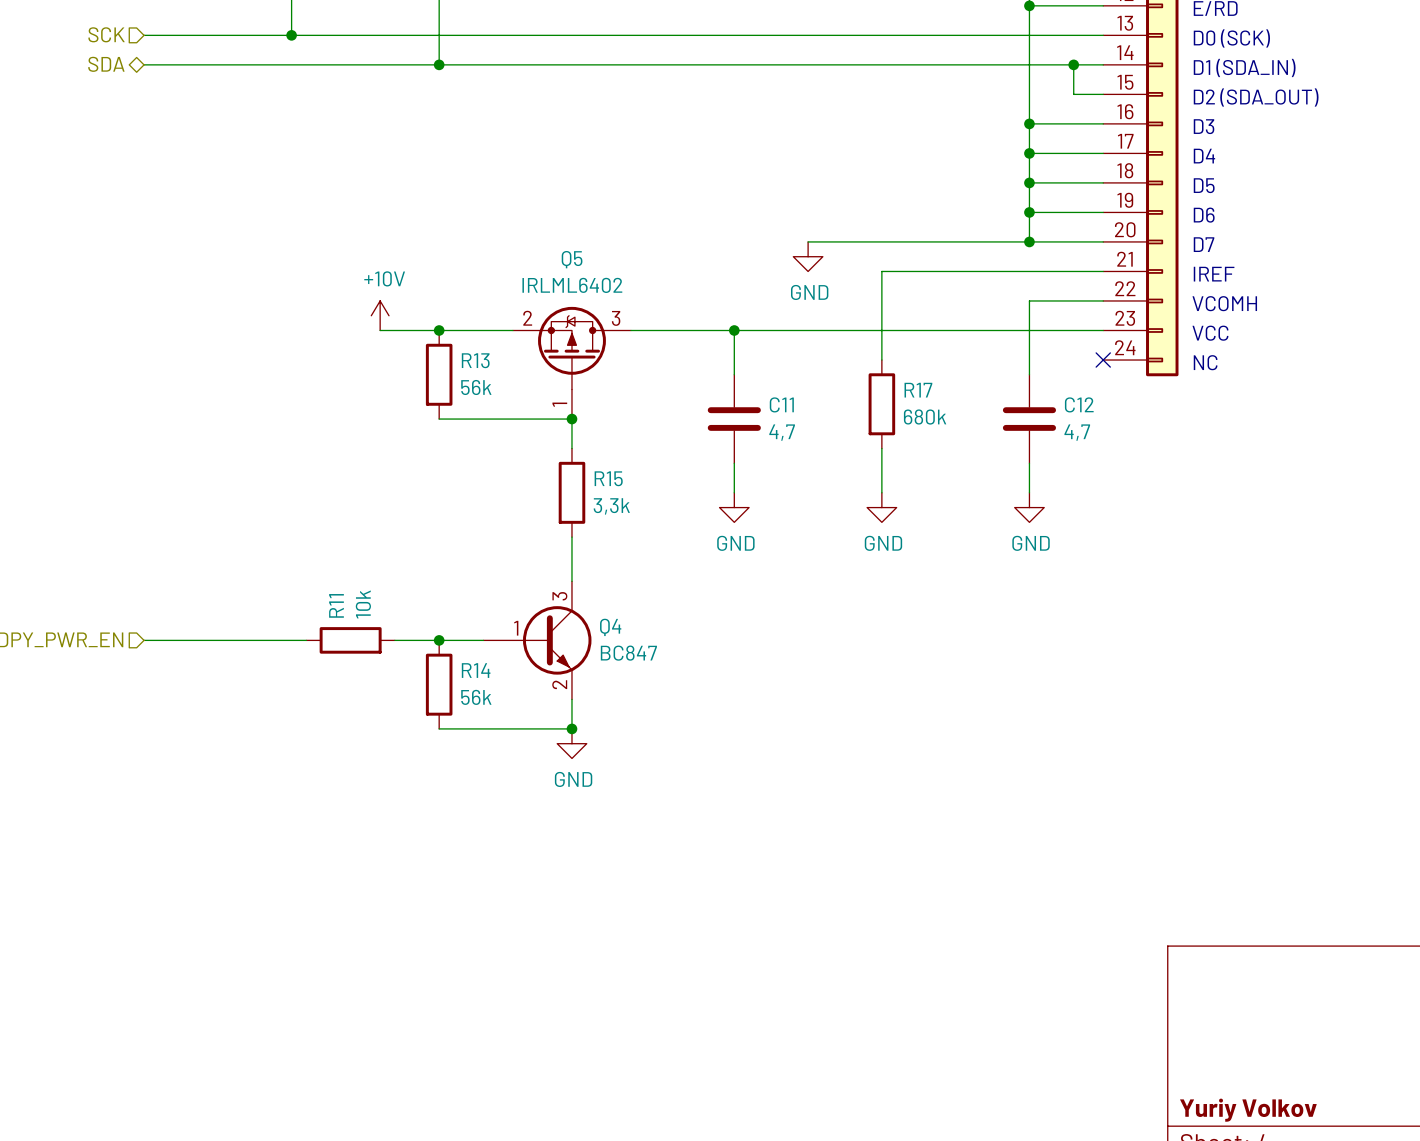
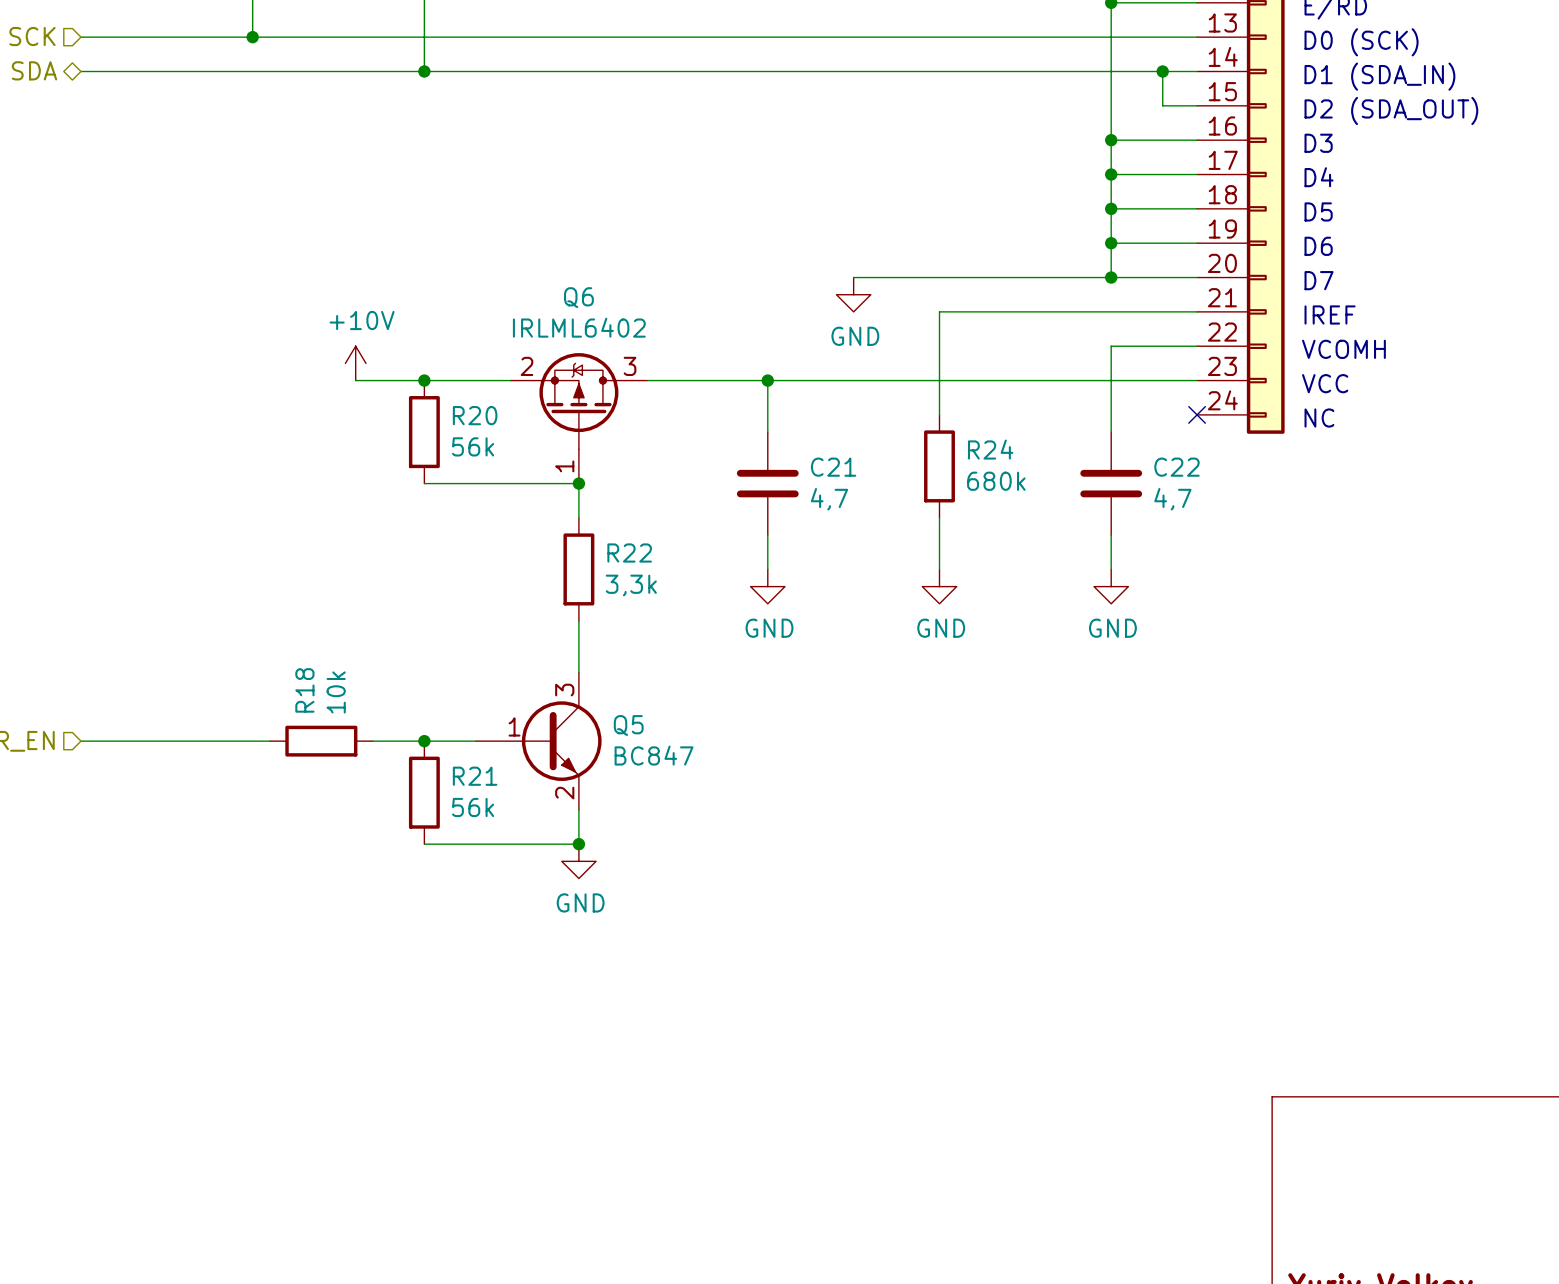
Q5 name: Q5 (572, 259) -> Q6 (578, 297)
R13 name: R13 (475, 360) -> R20 (475, 415)
R17 name: R17 (918, 390) -> R24 (990, 449)
C11 name: C11 (781, 404) -> C21 (833, 467)
C12 name: C12 (1079, 404) -> C22 (1176, 467)
R15 name: R15 (608, 478) -> R22 (629, 553)
R11 name: R11 (336, 605) -> R18 (304, 690)
Q4 name: Q4 (610, 627) -> Q5 (628, 725)
R14 name: R14 (476, 670) -> R21 (475, 776)

